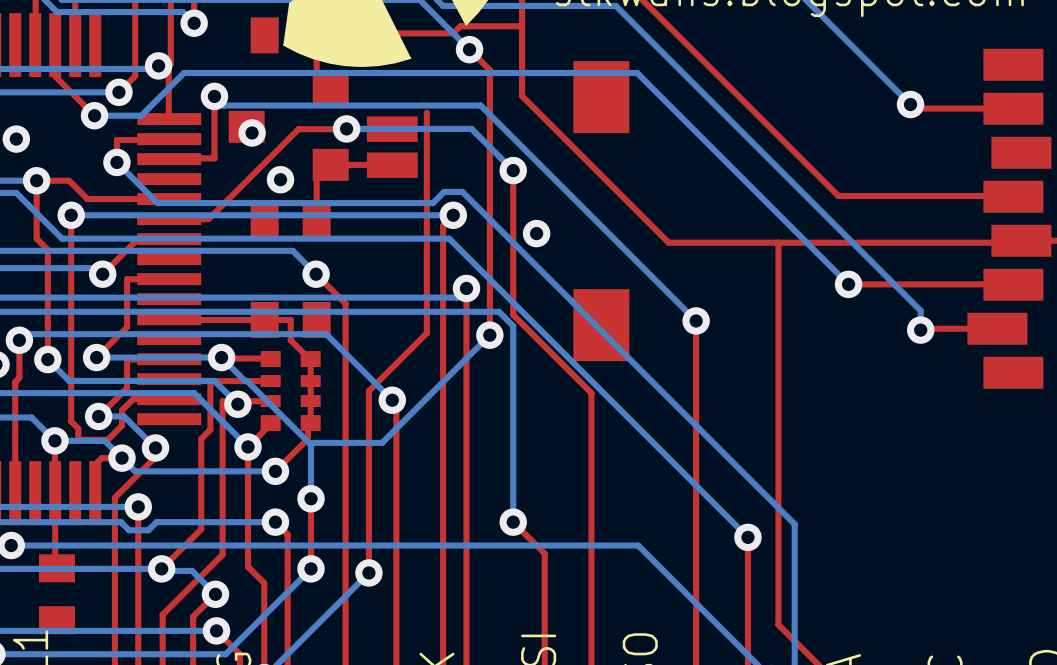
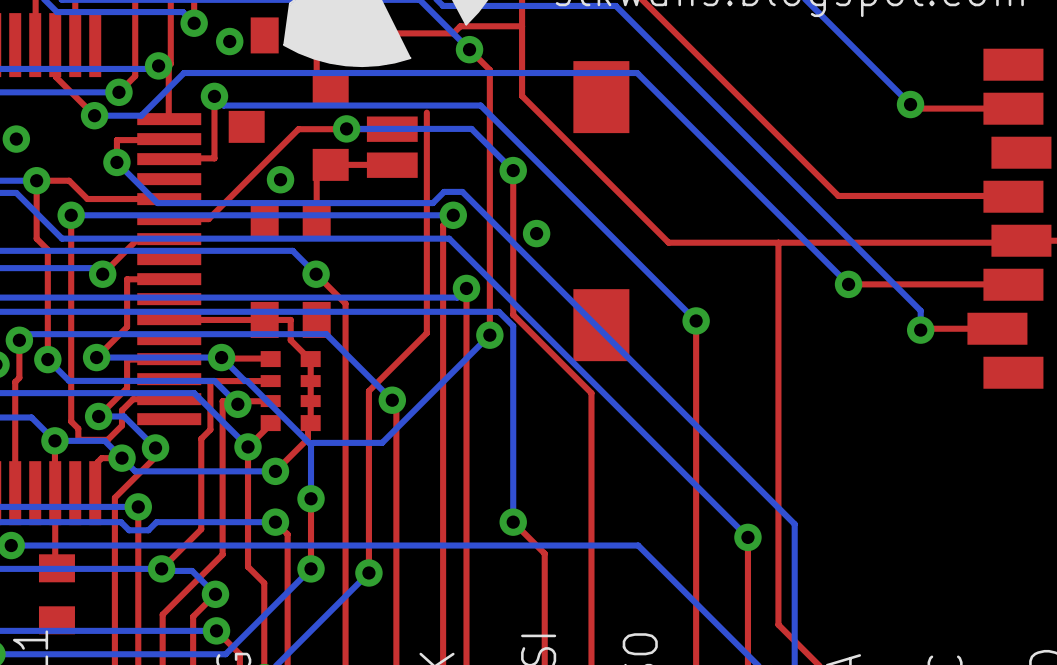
via position: (252, 132) -> (229, 41)

